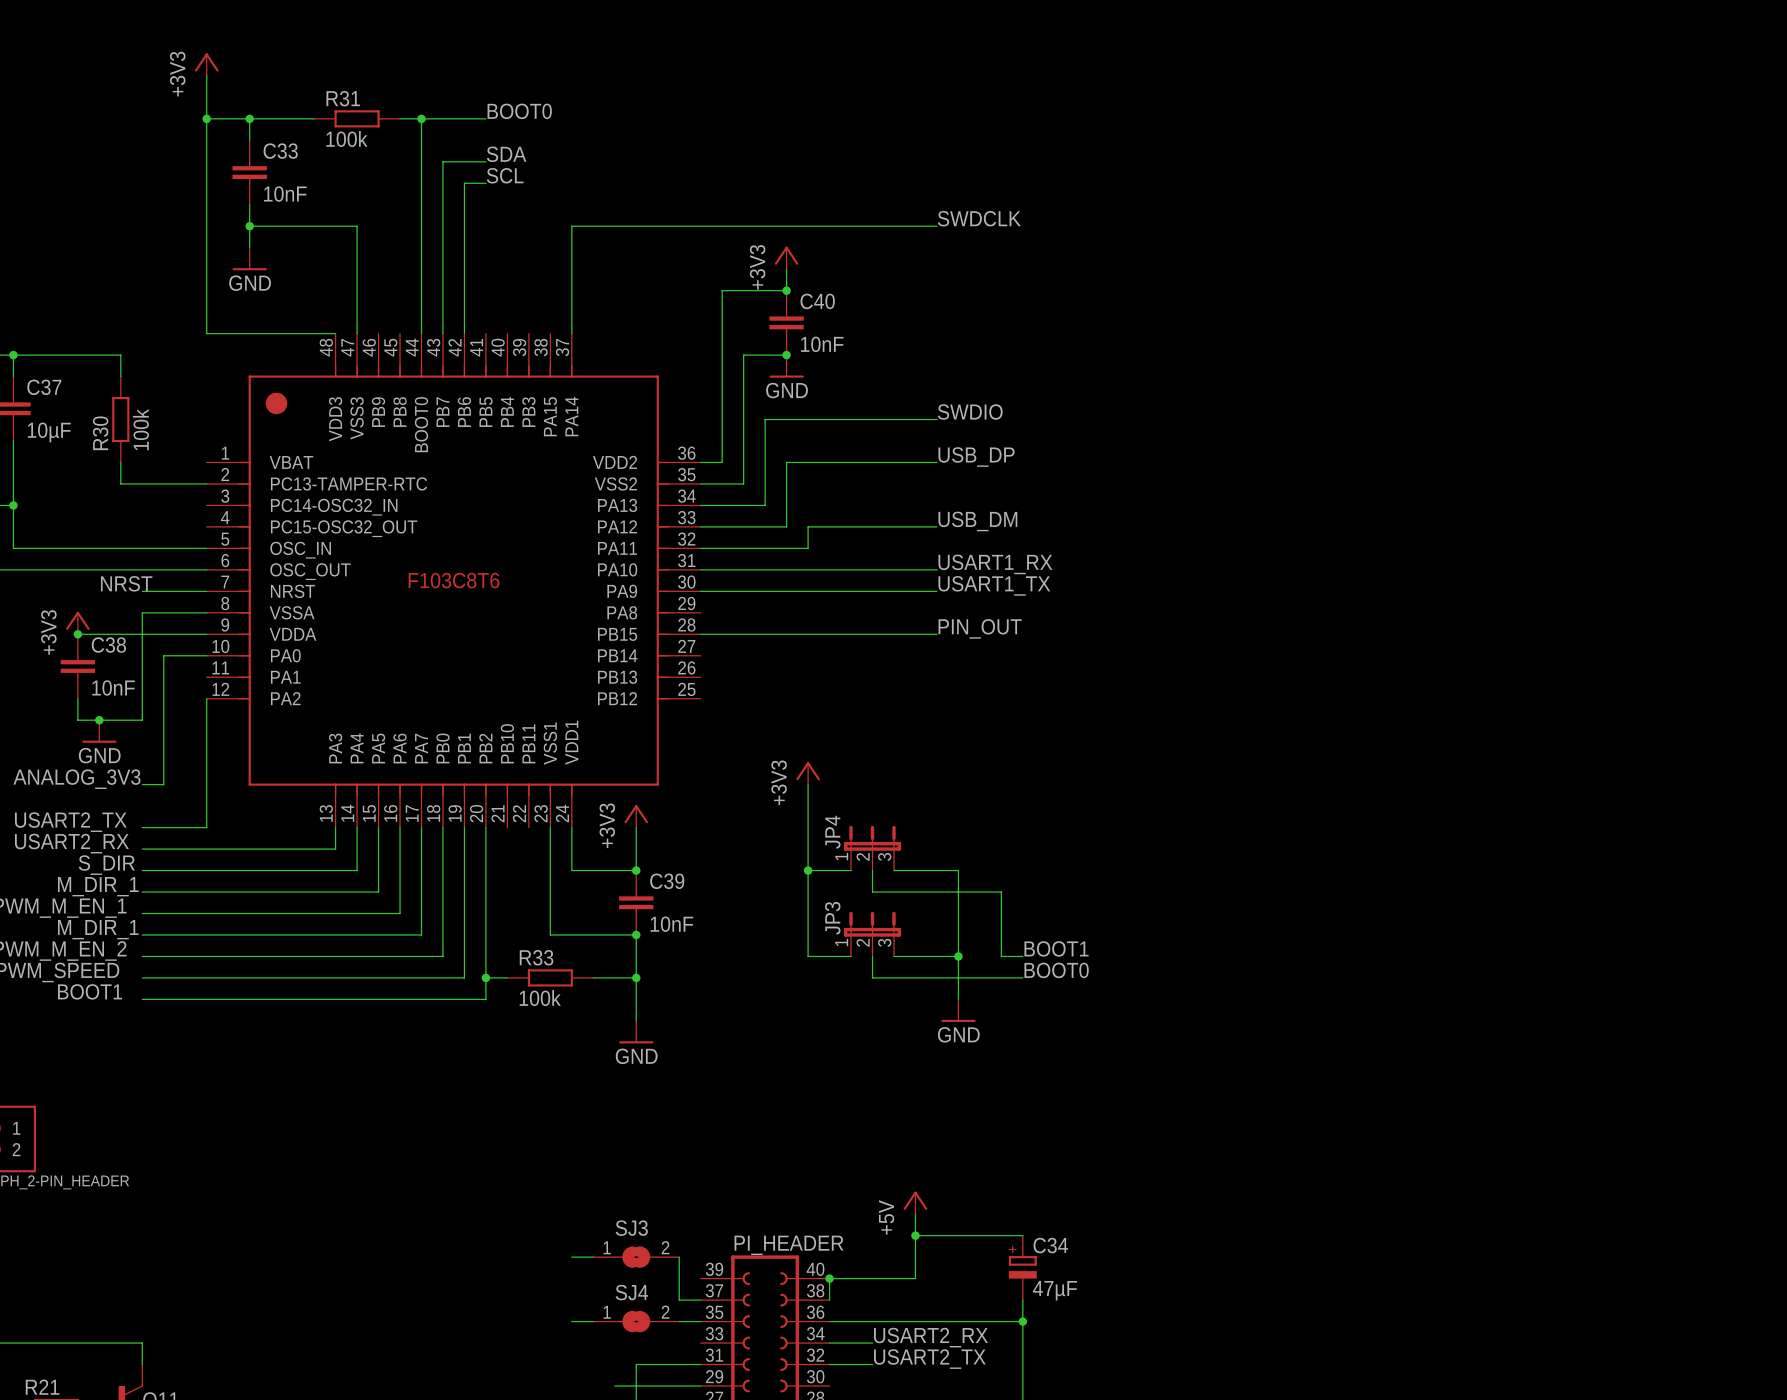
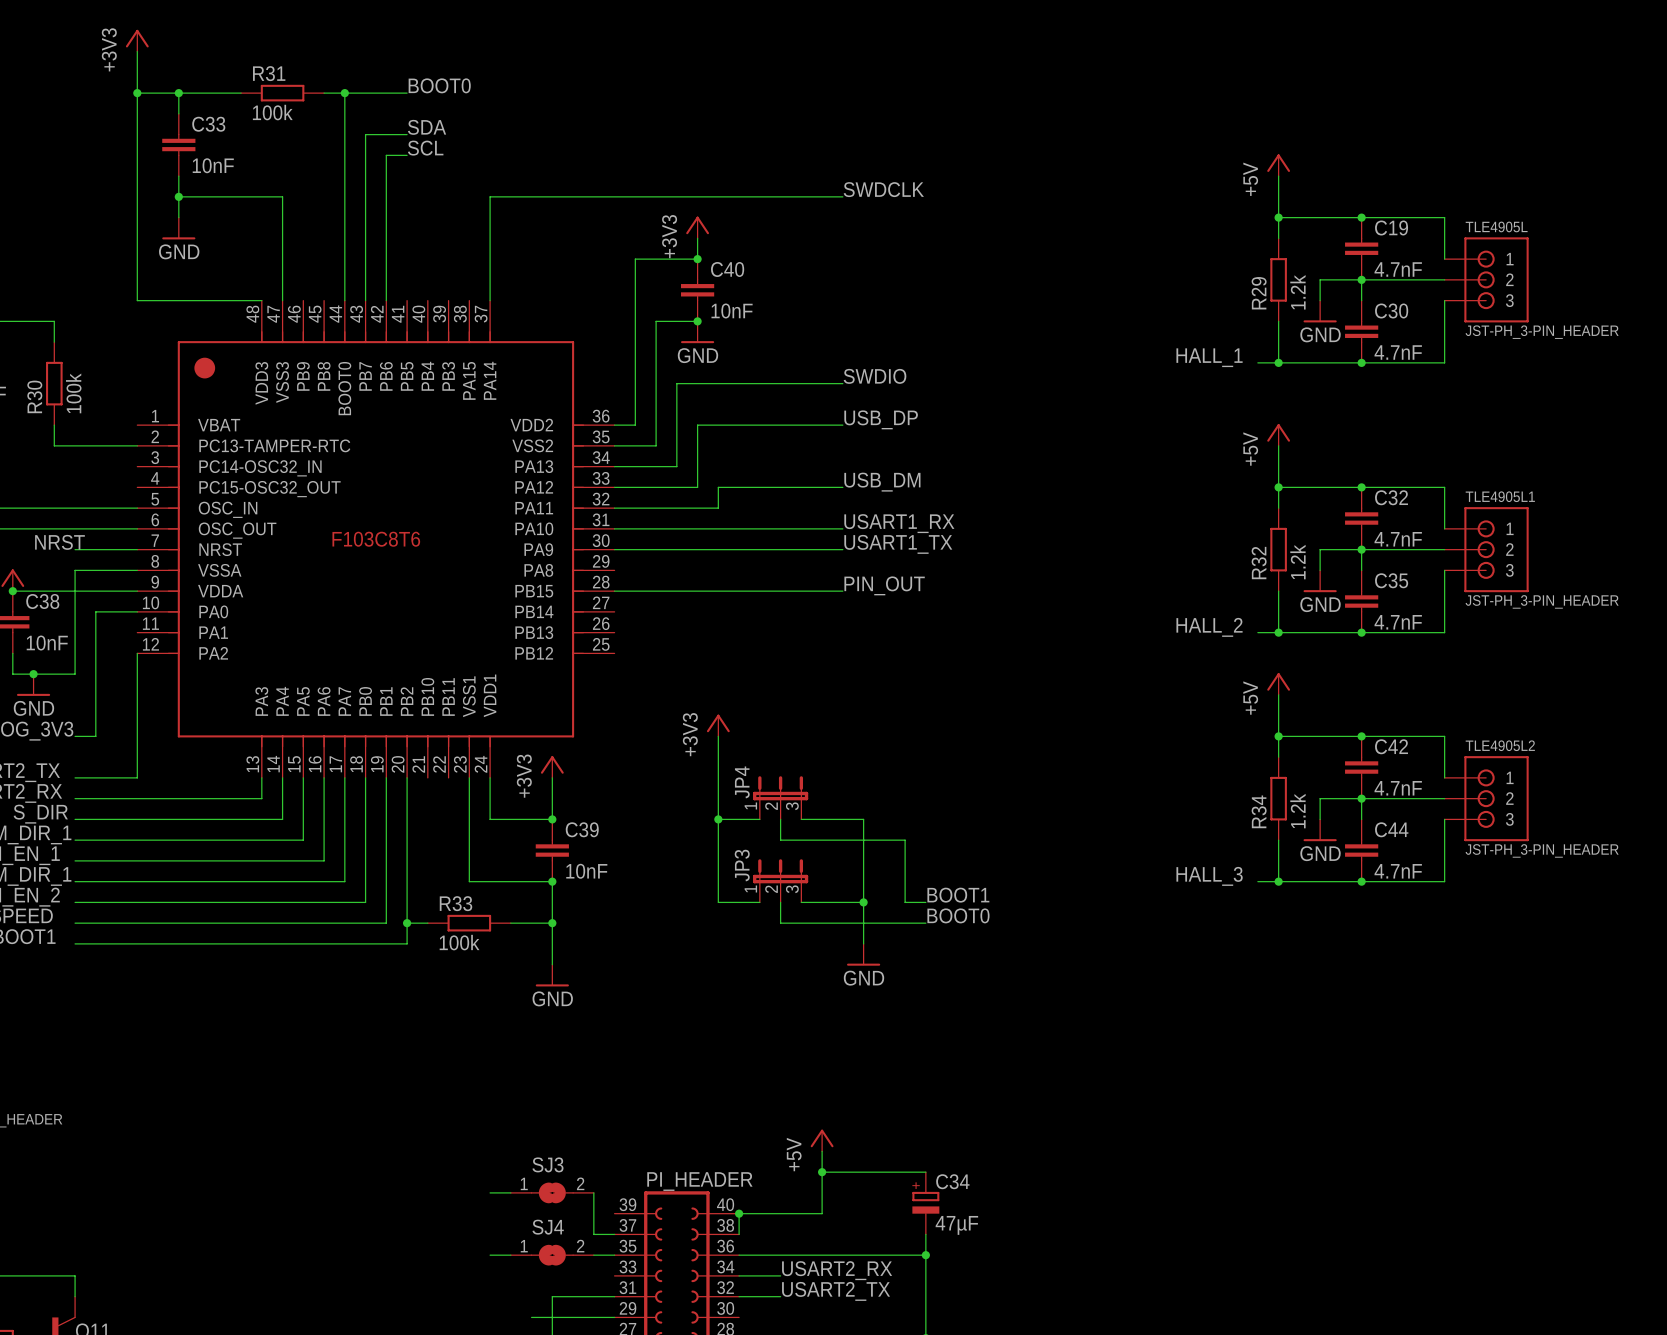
power symbol: none -> +5V (1278, 165)
wire: none -> (1278, 176) (1278, 238)
wire: none -> (1278, 217) (1444, 217) (1444, 259)
junction: none -> (1278, 217)
junction: none -> (1361, 217)
C19: none -> 4.7nF (1361, 248)
R29: none -> 1.2k (1278, 279)
wire: none -> (1361, 279) (1361, 300)
junction: none -> (1361, 279)
wire: none -> (1444, 279) (1320, 279) (1320, 300)
TLE4905L: none -> JST-PH_3-PIN_HEADER (1486, 279)
wire: none -> (1444, 300) (1444, 362) (1257, 362)
power symbol: none -> GND (1320, 311)
wire: none -> (1278, 321) (1278, 362)
C30: none -> 4.7nF (1361, 331)
label: none -> HALL_1 (1209, 357)
junction: none -> (1278, 362)
junction: none -> (1361, 362)
power symbol: none -> +5V (1278, 434)
wire: none -> (1278, 445) (1278, 508)
wire: none -> (1278, 487) (1444, 487) (1444, 528)
junction: none -> (1278, 487)
junction: none -> (1361, 487)
C32: none -> 4.7nF (1361, 518)
R32: none -> 1.2k (1278, 549)
wire: none -> (1361, 549) (1361, 570)
junction: none -> (1361, 549)
wire: none -> (1444, 549) (1320, 549) (1320, 570)
TLE4905L1: none -> JST-PH_3-PIN_HEADER (1486, 549)
wire: none -> (1444, 570) (1444, 632) (1257, 632)
power symbol: none -> GND (1320, 581)
wire: none -> (1278, 591) (1278, 632)
C35: none -> 4.7nF (1361, 601)
label: none -> HALL_2 (1209, 627)
junction: none -> (1278, 632)
junction: none -> (1361, 632)
power symbol: none -> +5V (1278, 684)
wire: none -> (1278, 694) (1278, 757)
wire: none -> (1278, 736) (1444, 736) (1444, 777)
junction: none -> (1278, 736)
junction: none -> (1361, 736)
C42: none -> 4.7nF (1361, 767)
R34: none -> 1.2k (1278, 798)
wire: none -> (1361, 798) (1361, 819)
junction: none -> (1361, 798)
wire: none -> (1444, 798) (1320, 798) (1320, 819)
TLE4905L2: none -> JST-PH_3-PIN_HEADER (1486, 798)
wire: none -> (1444, 819) (1444, 881) (1257, 881)
power symbol: none -> GND (1320, 830)
wire: none -> (1278, 840) (1278, 881)
C44: none -> 4.7nF (1361, 850)
label: none -> HALL_3 (1209, 876)
junction: none -> (1278, 881)
junction: none -> (1361, 881)

